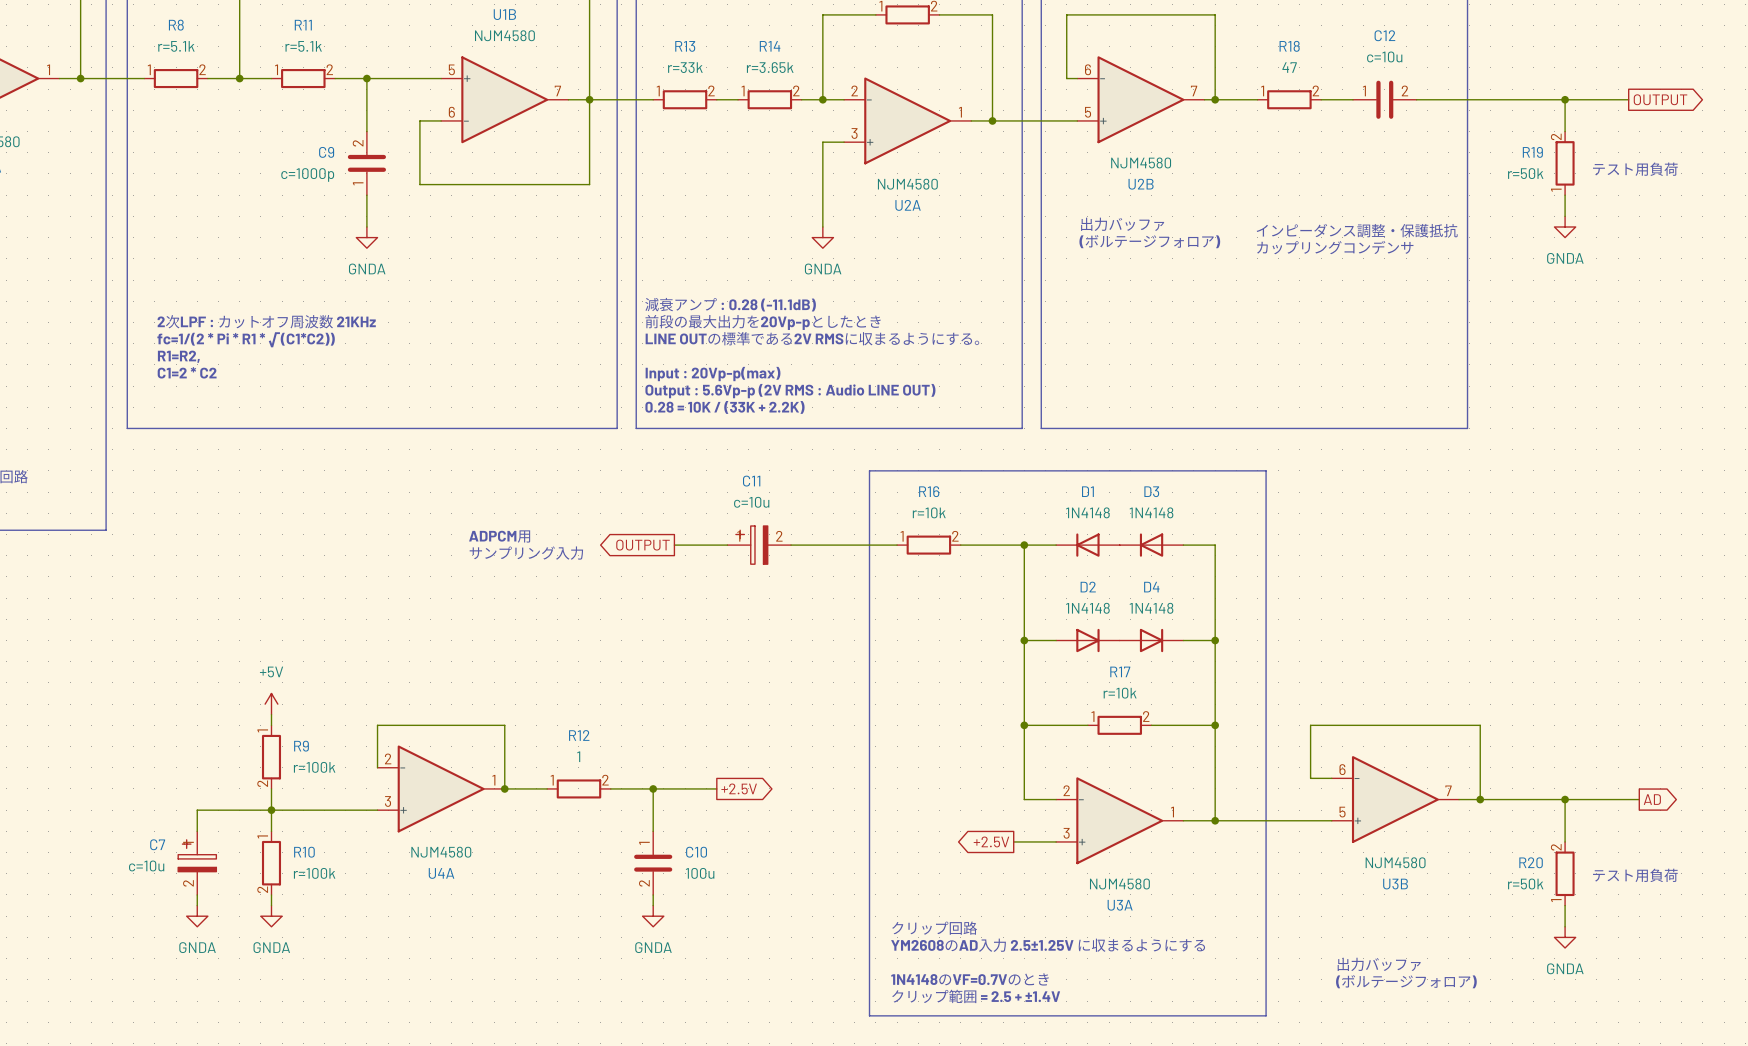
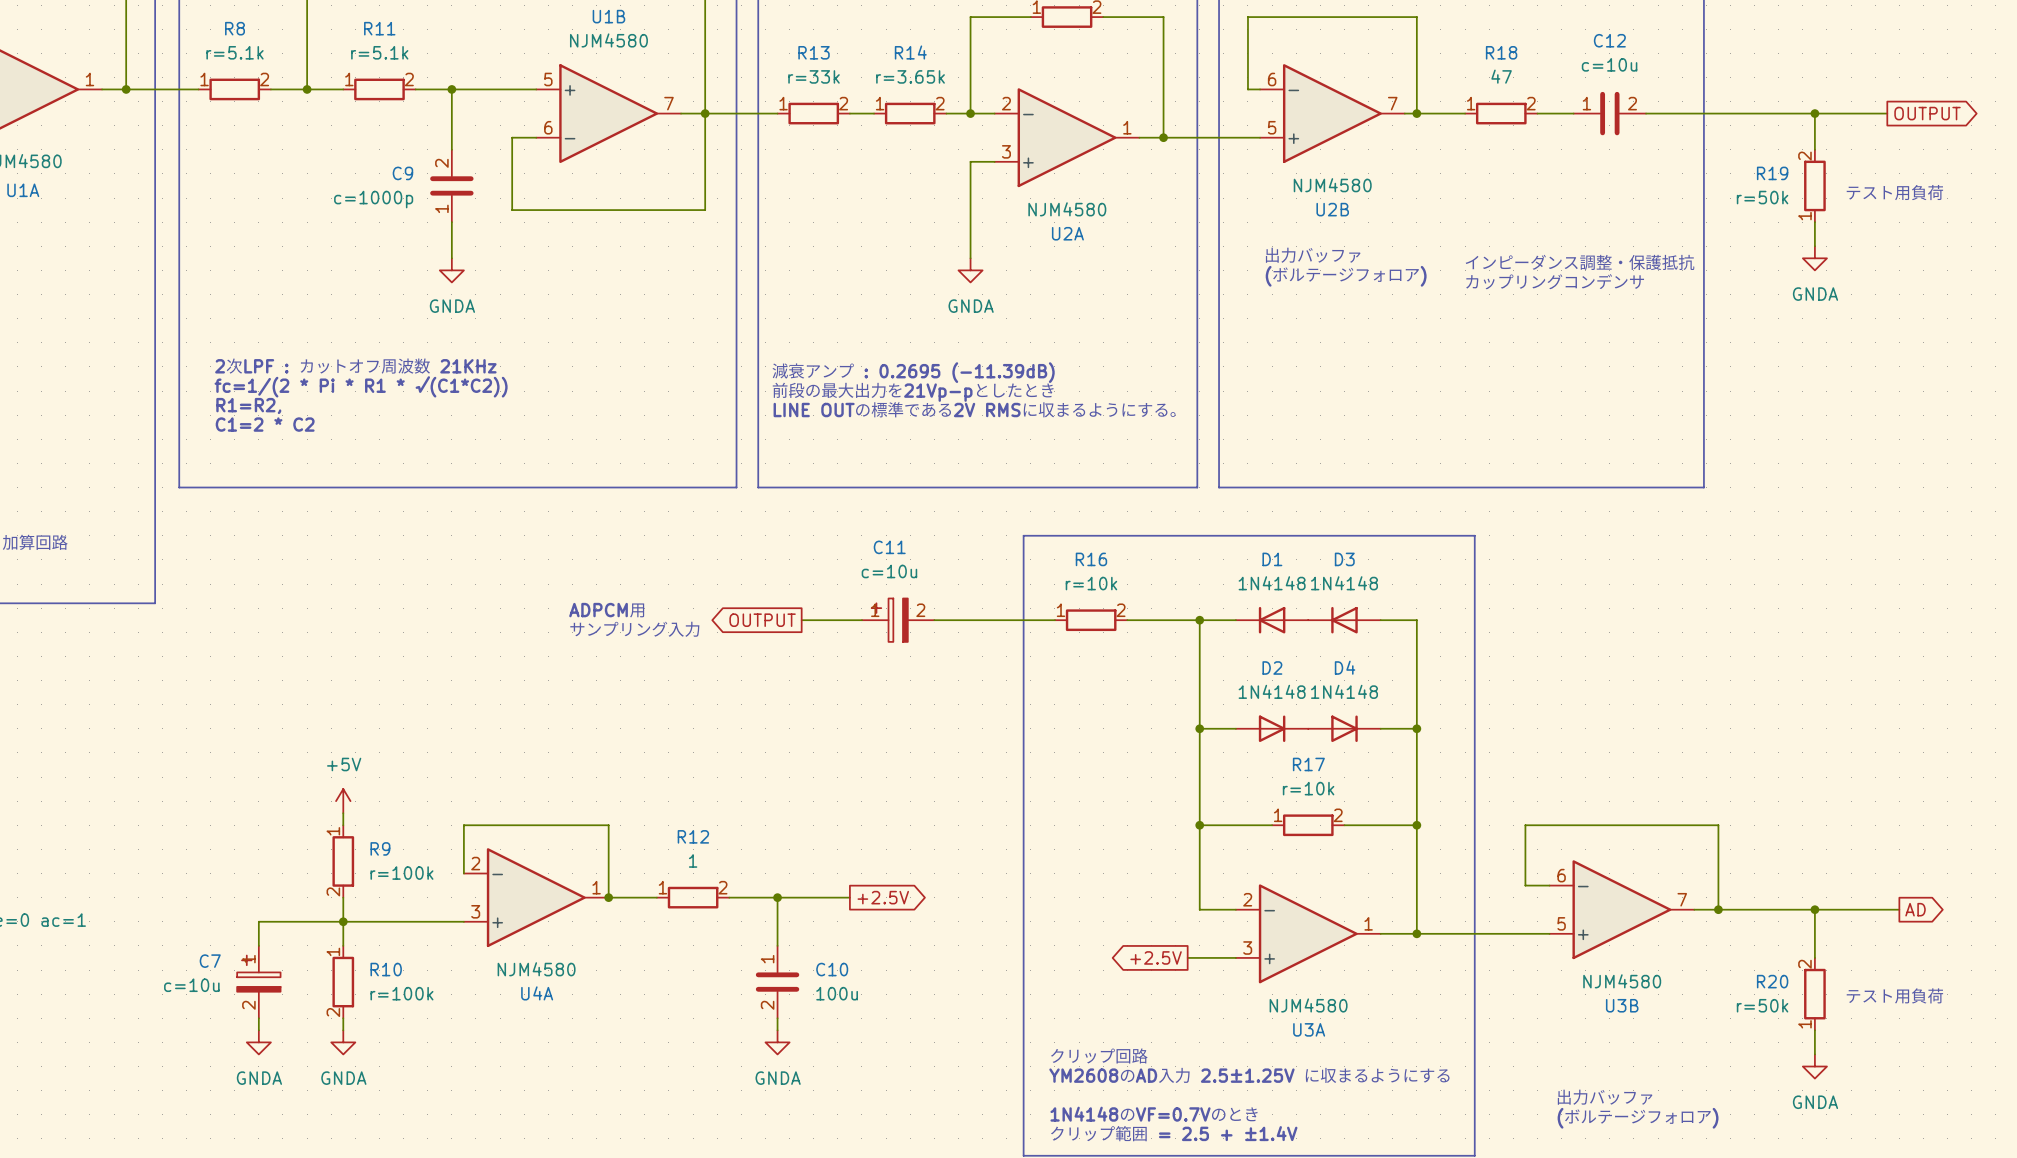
text: 減衰アンプ : 0.28 (-11.1dB) (730, 304) -> none
text: 前段の最大出力を20Vp-pとしたとき (763, 322) -> 減衰アンプ : 0.2695 (-11.39dB) (913, 372)
text: LINE OUTの標準である2V RMSに収まるようにする。 (812, 338) -> 前段の最大出力を21Vp-pとしたとき (913, 391)
text: none -> LINE OUTの標準である2V RMSに収まるようにする。 (975, 409)
text: Input : 20Vp-p(max) (713, 374) -> none
text: Output : 5.6Vp-p (2V RMS : Audio LINE OUT) (790, 391) -> none
text: 0.28 = 10K / (33K + 2.2K) (724, 407) -> none

